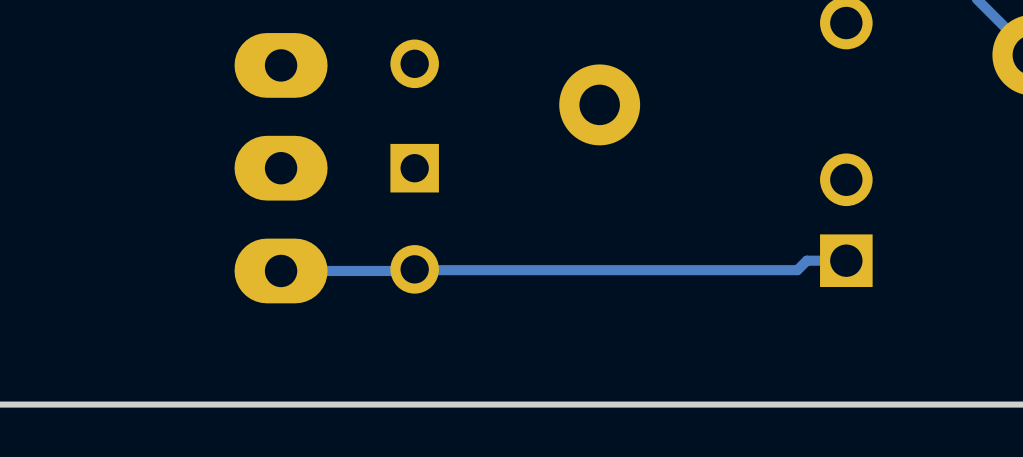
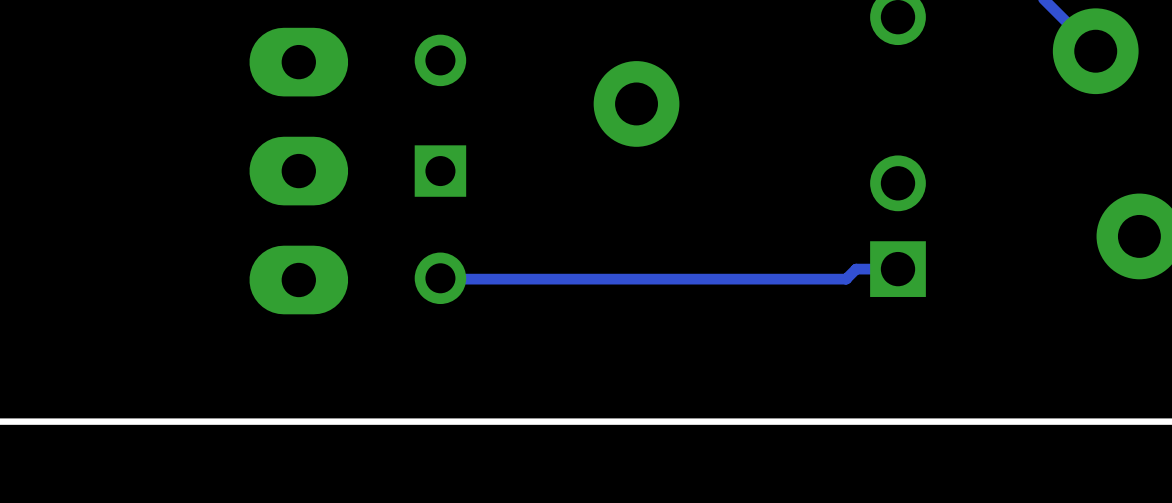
track: (414, 269) (413, 270) (281, 270) -> none

